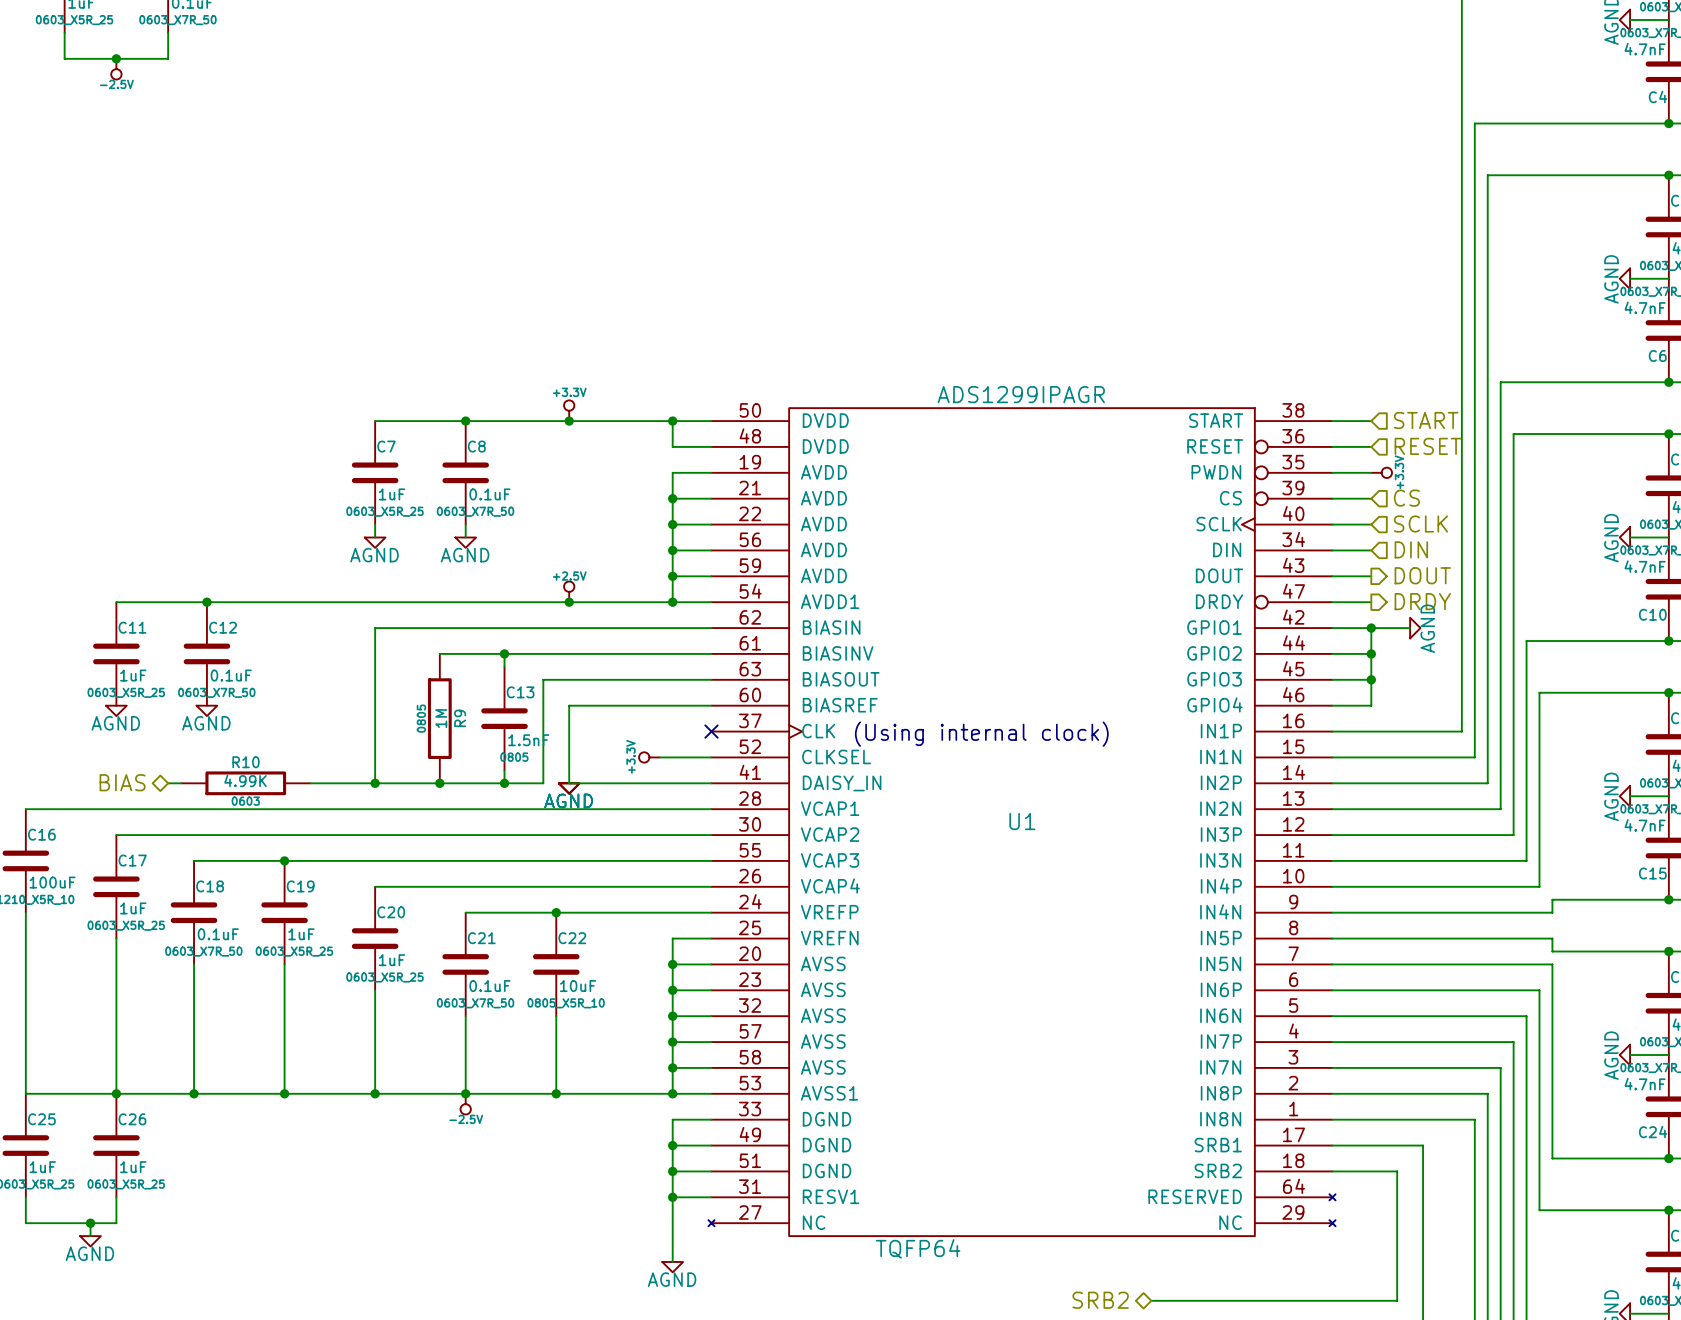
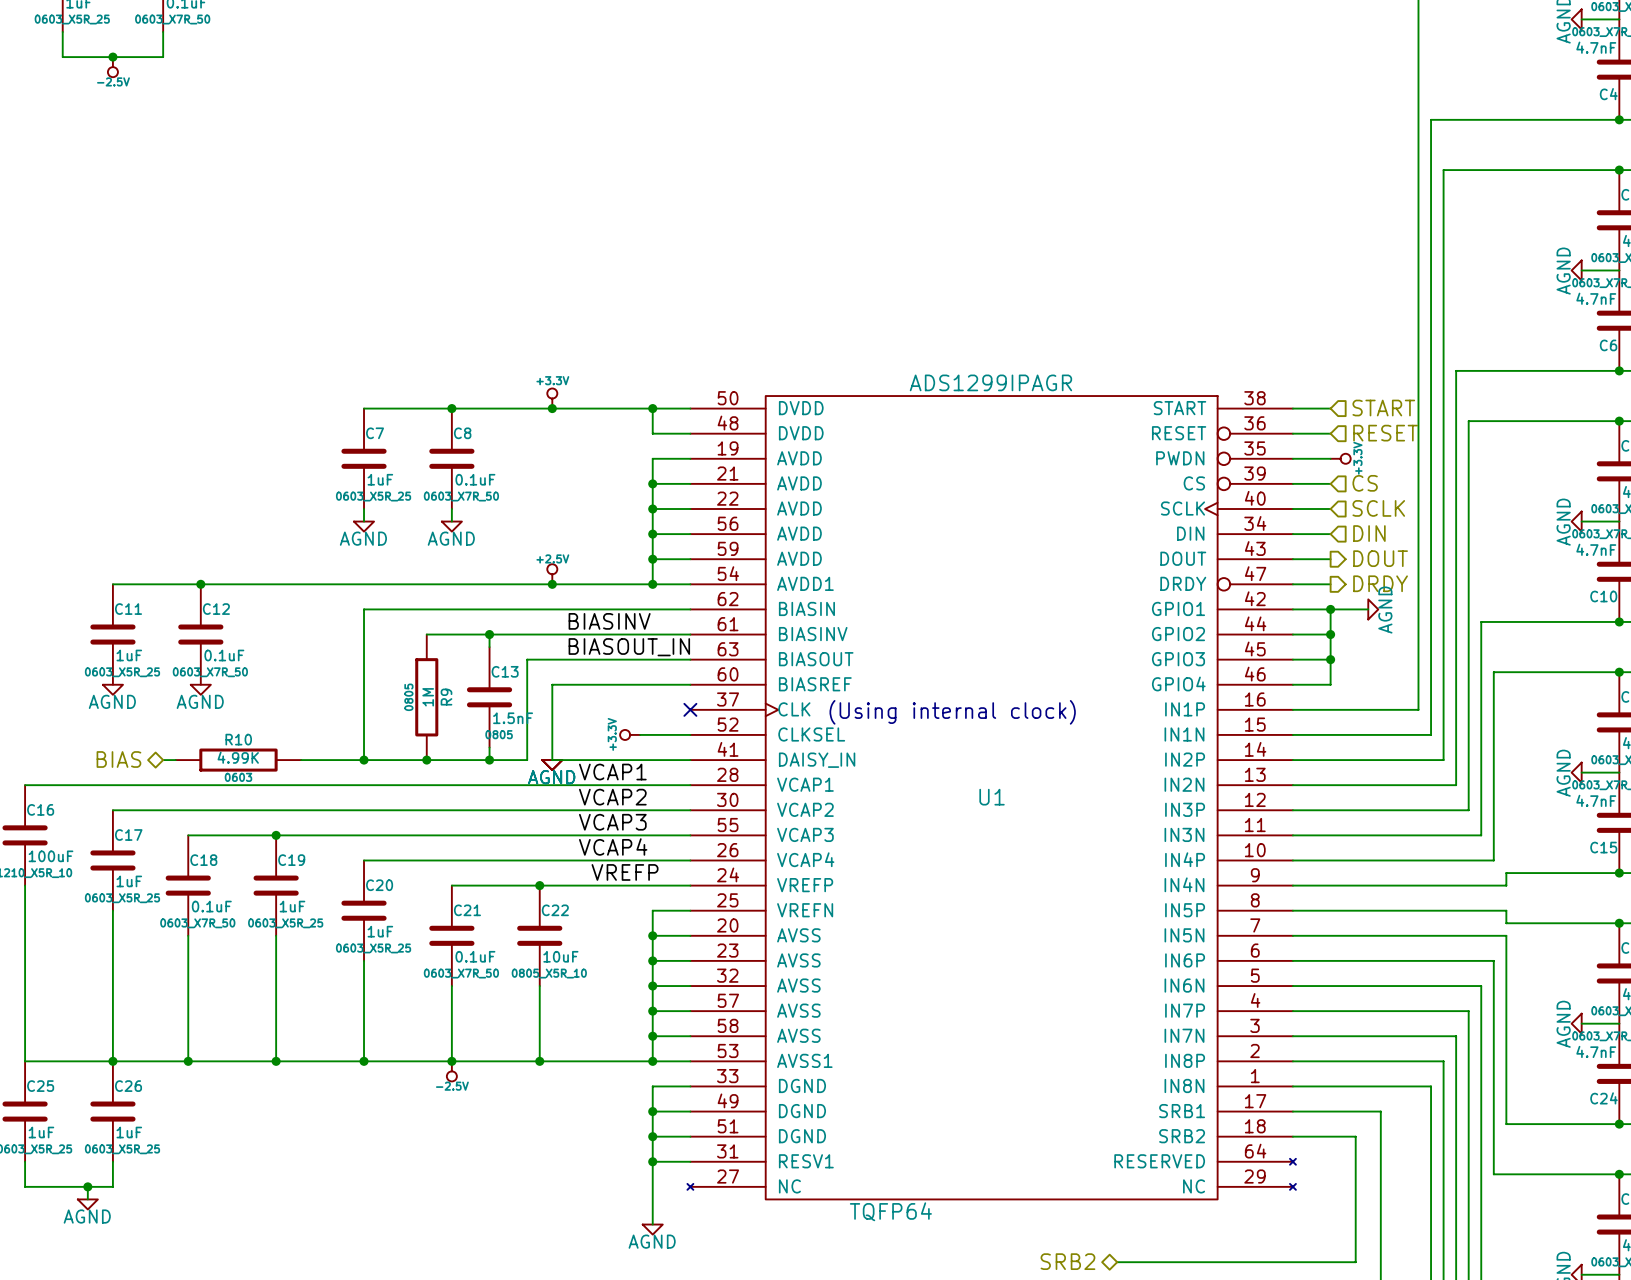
label: none -> BIASINV (609, 621)
label: none -> BIASOUT_IN (629, 647)
label: none -> VCAP1 (612, 772)
label: none -> VCAP2 (612, 797)
label: none -> VCAP3 (612, 822)
label: none -> VCAP4 (613, 846)
label: none -> VREFP (625, 872)

